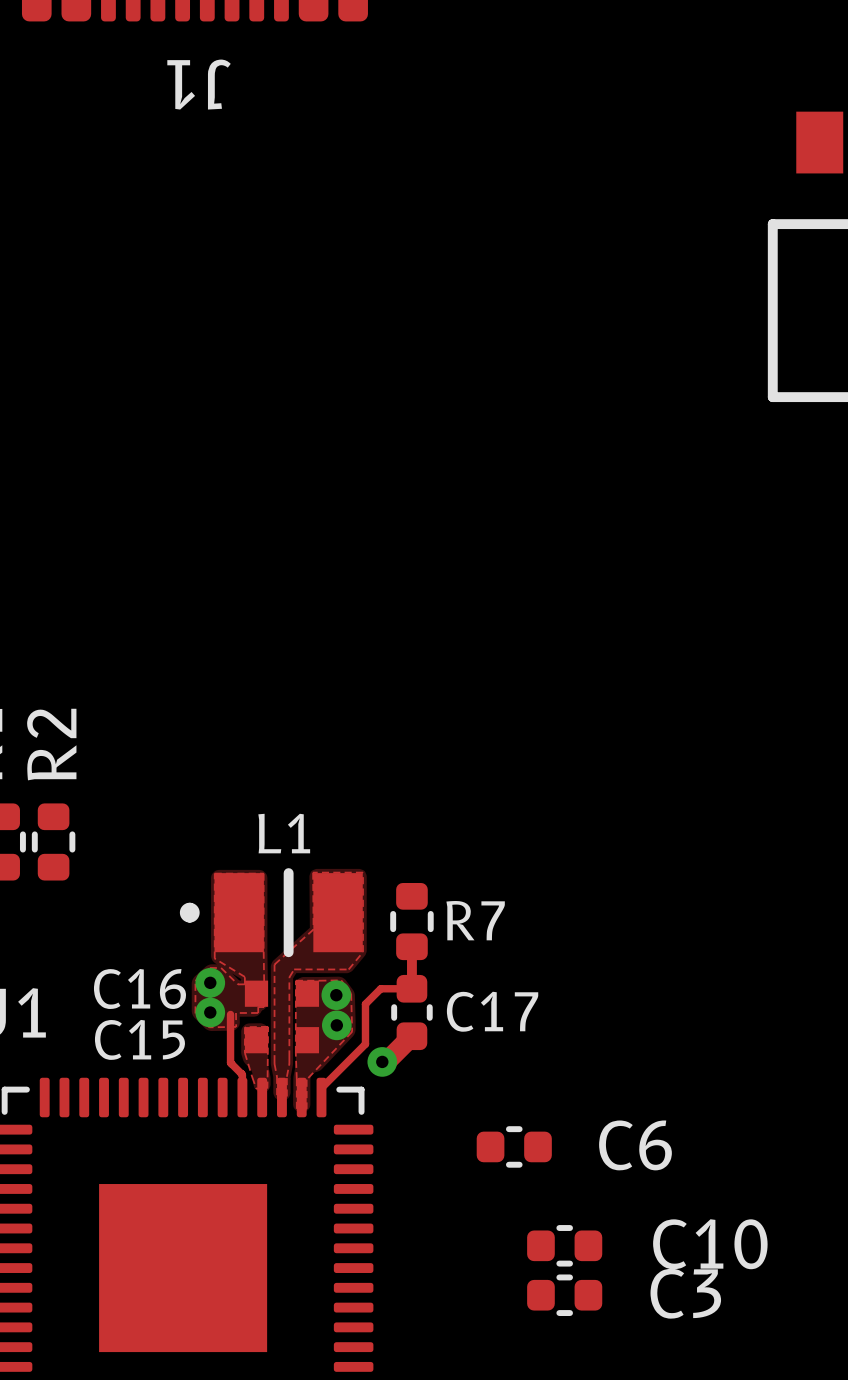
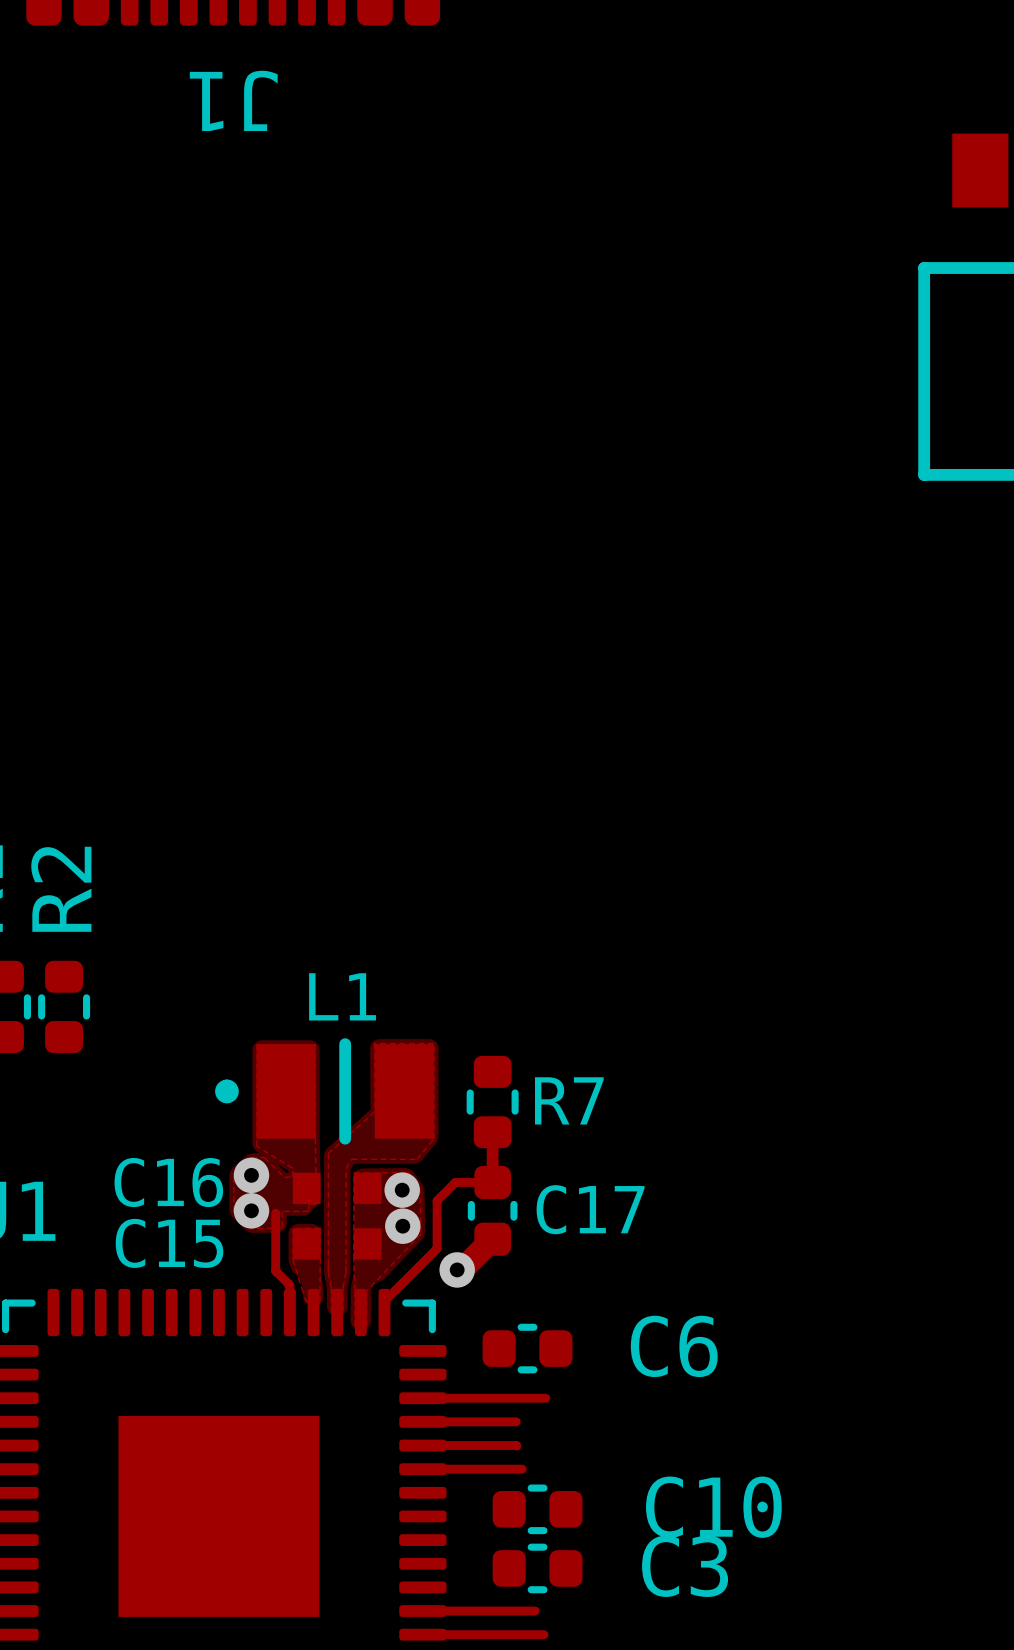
C6 position: (514, 1146) -> (527, 1348)
top track: none -> (422, 1398) (545, 1398)
top track: none -> (422, 1421) (516, 1421)
top track: none -> (422, 1445) (516, 1445)
top track: none -> (422, 1469) (522, 1469)
C10 position: (564, 1245) -> (537, 1509)
C3 position: (564, 1295) -> (537, 1568)
top track: none -> (422, 1611) (535, 1611)
top track: none -> (422, 1634) (544, 1634)

